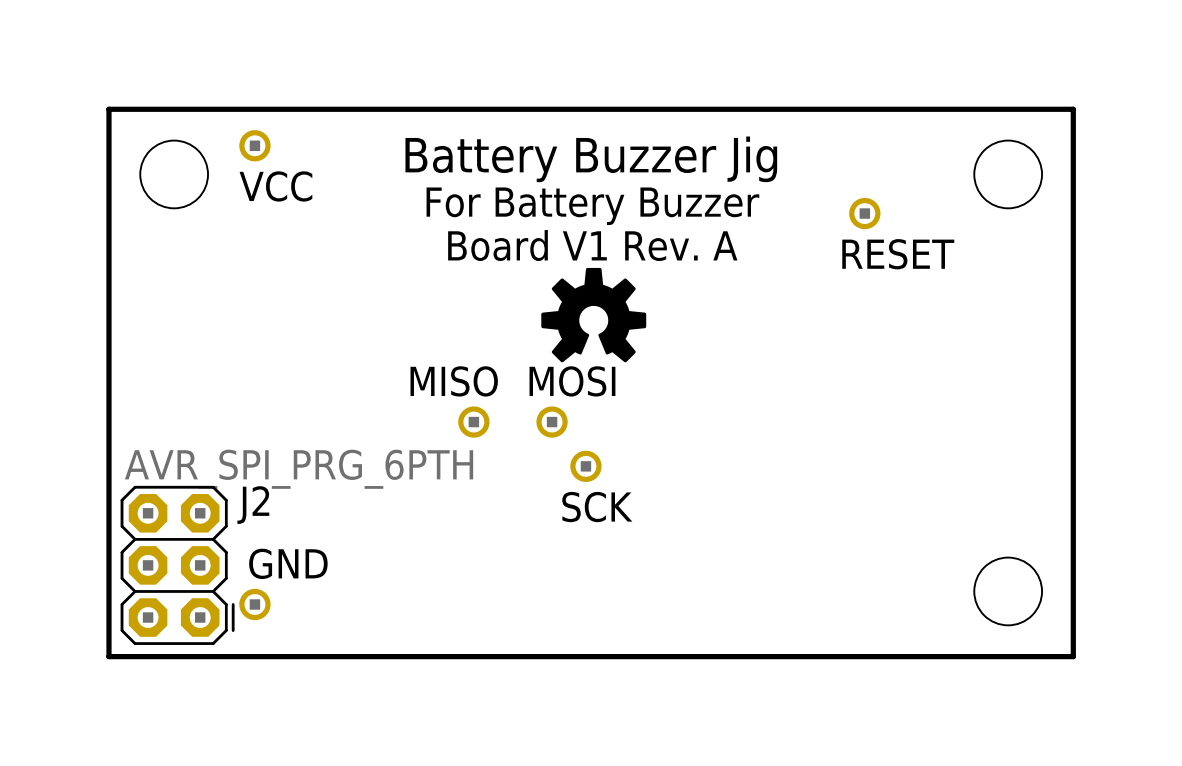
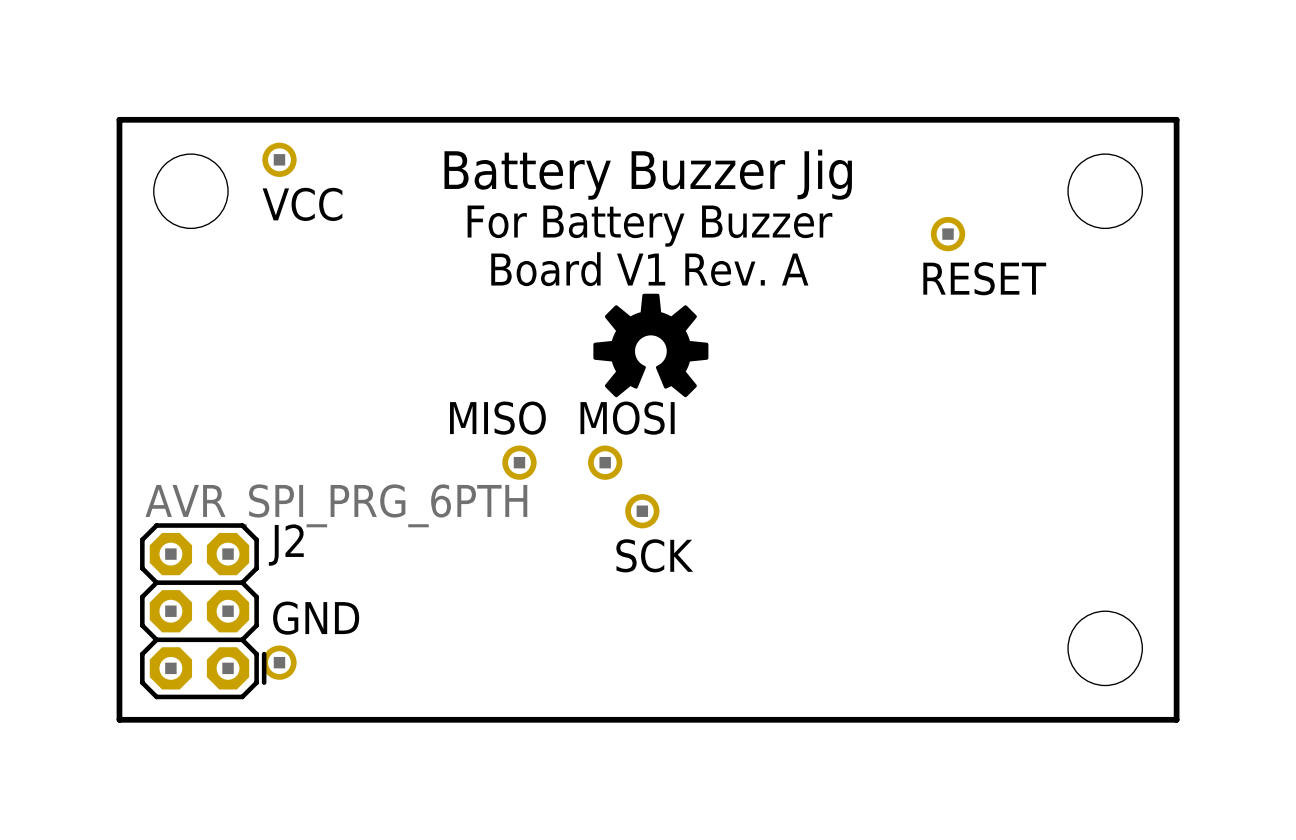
J2 footprint: [120, 485, 235, 645] -> [140, 523, 267, 700]

